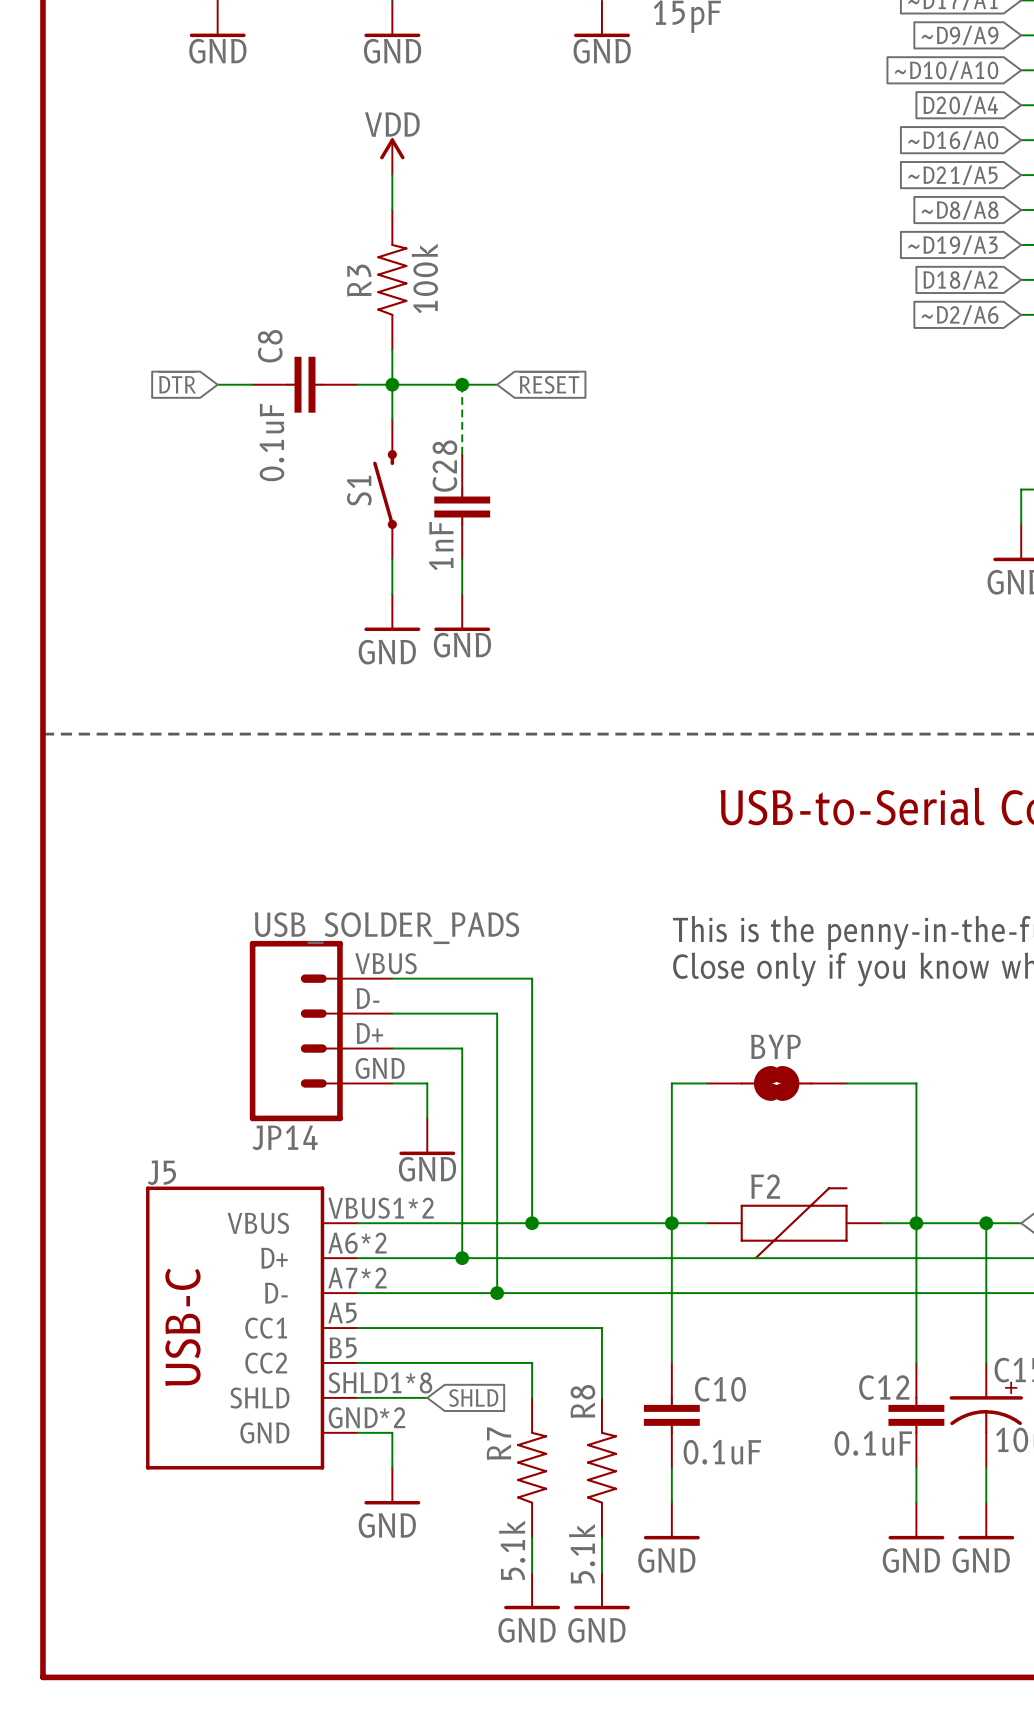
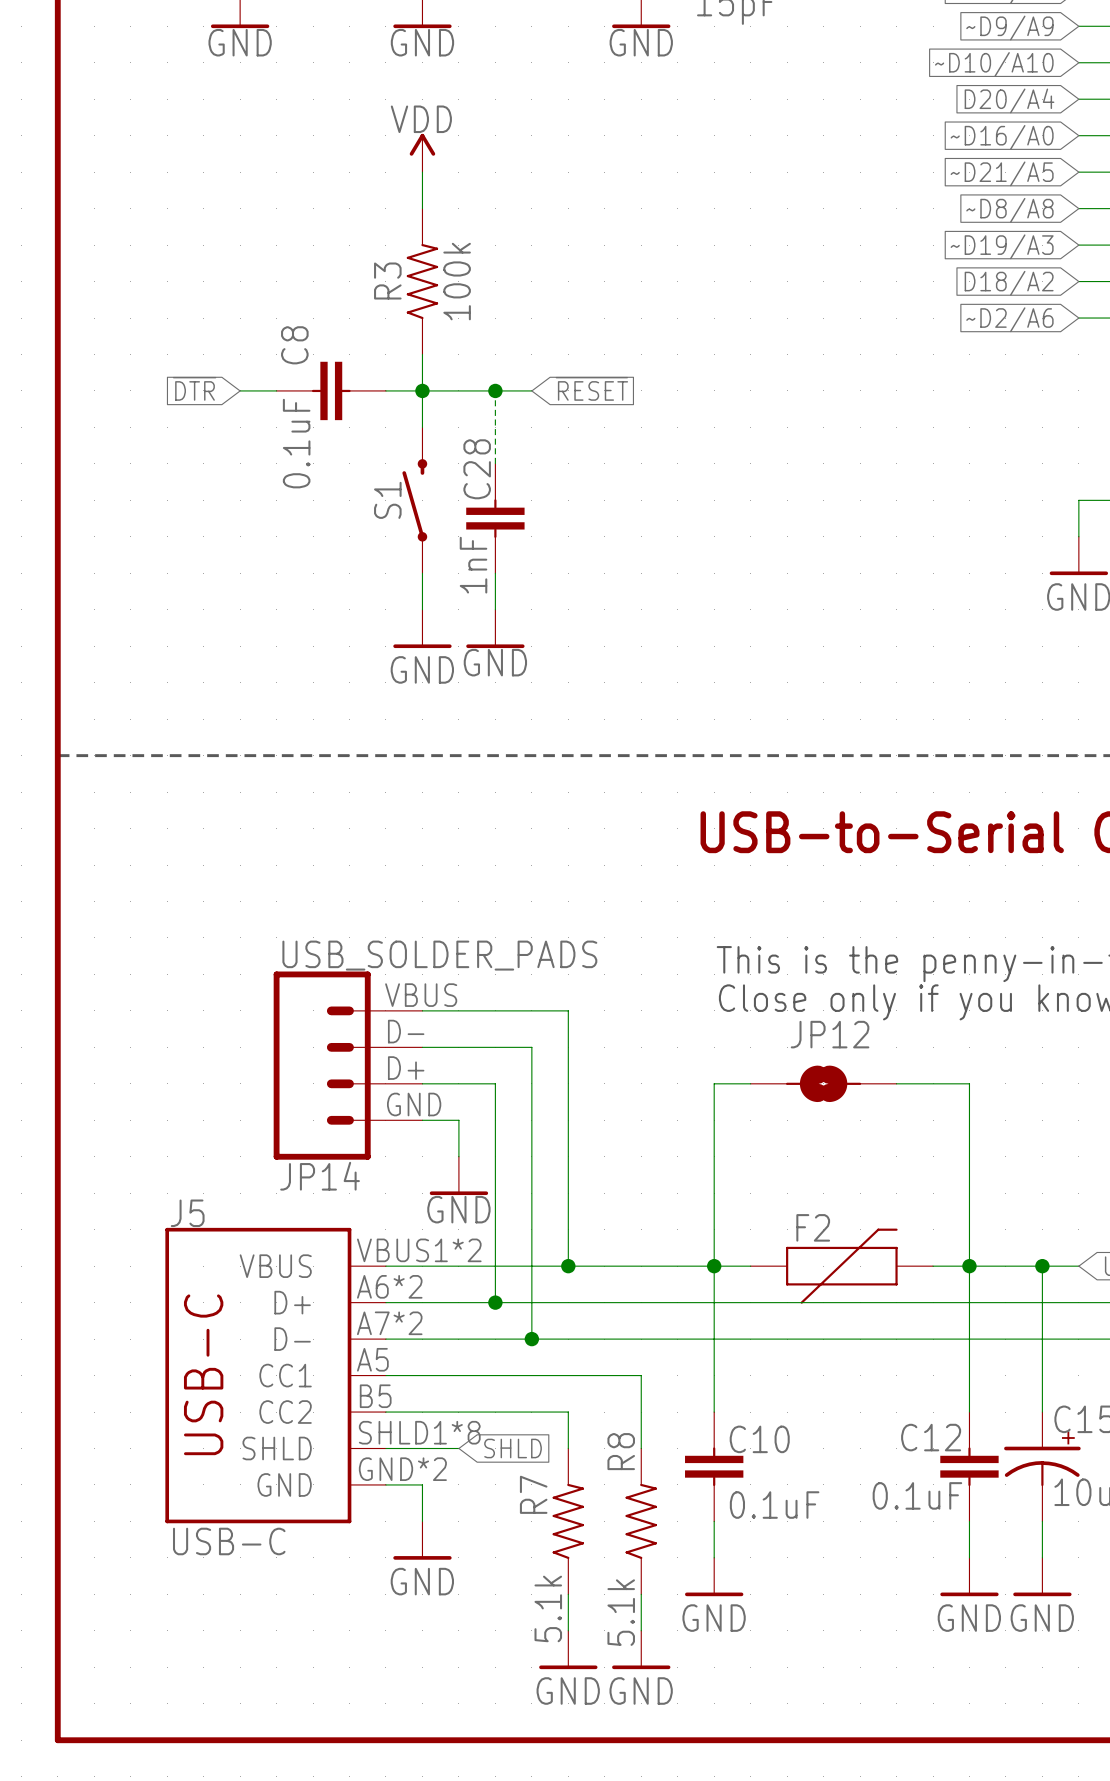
JP12: none -> (823, 1083)
wire: (671, 1083) (706, 1083) -> (714, 1120) (714, 1083) (750, 1083)
BYP: (776, 1083) -> none
wire: (846, 1083) (916, 1083) -> (896, 1083) (969, 1083) (969, 1120)
J5 value: none -> USB-C (229, 1541)

